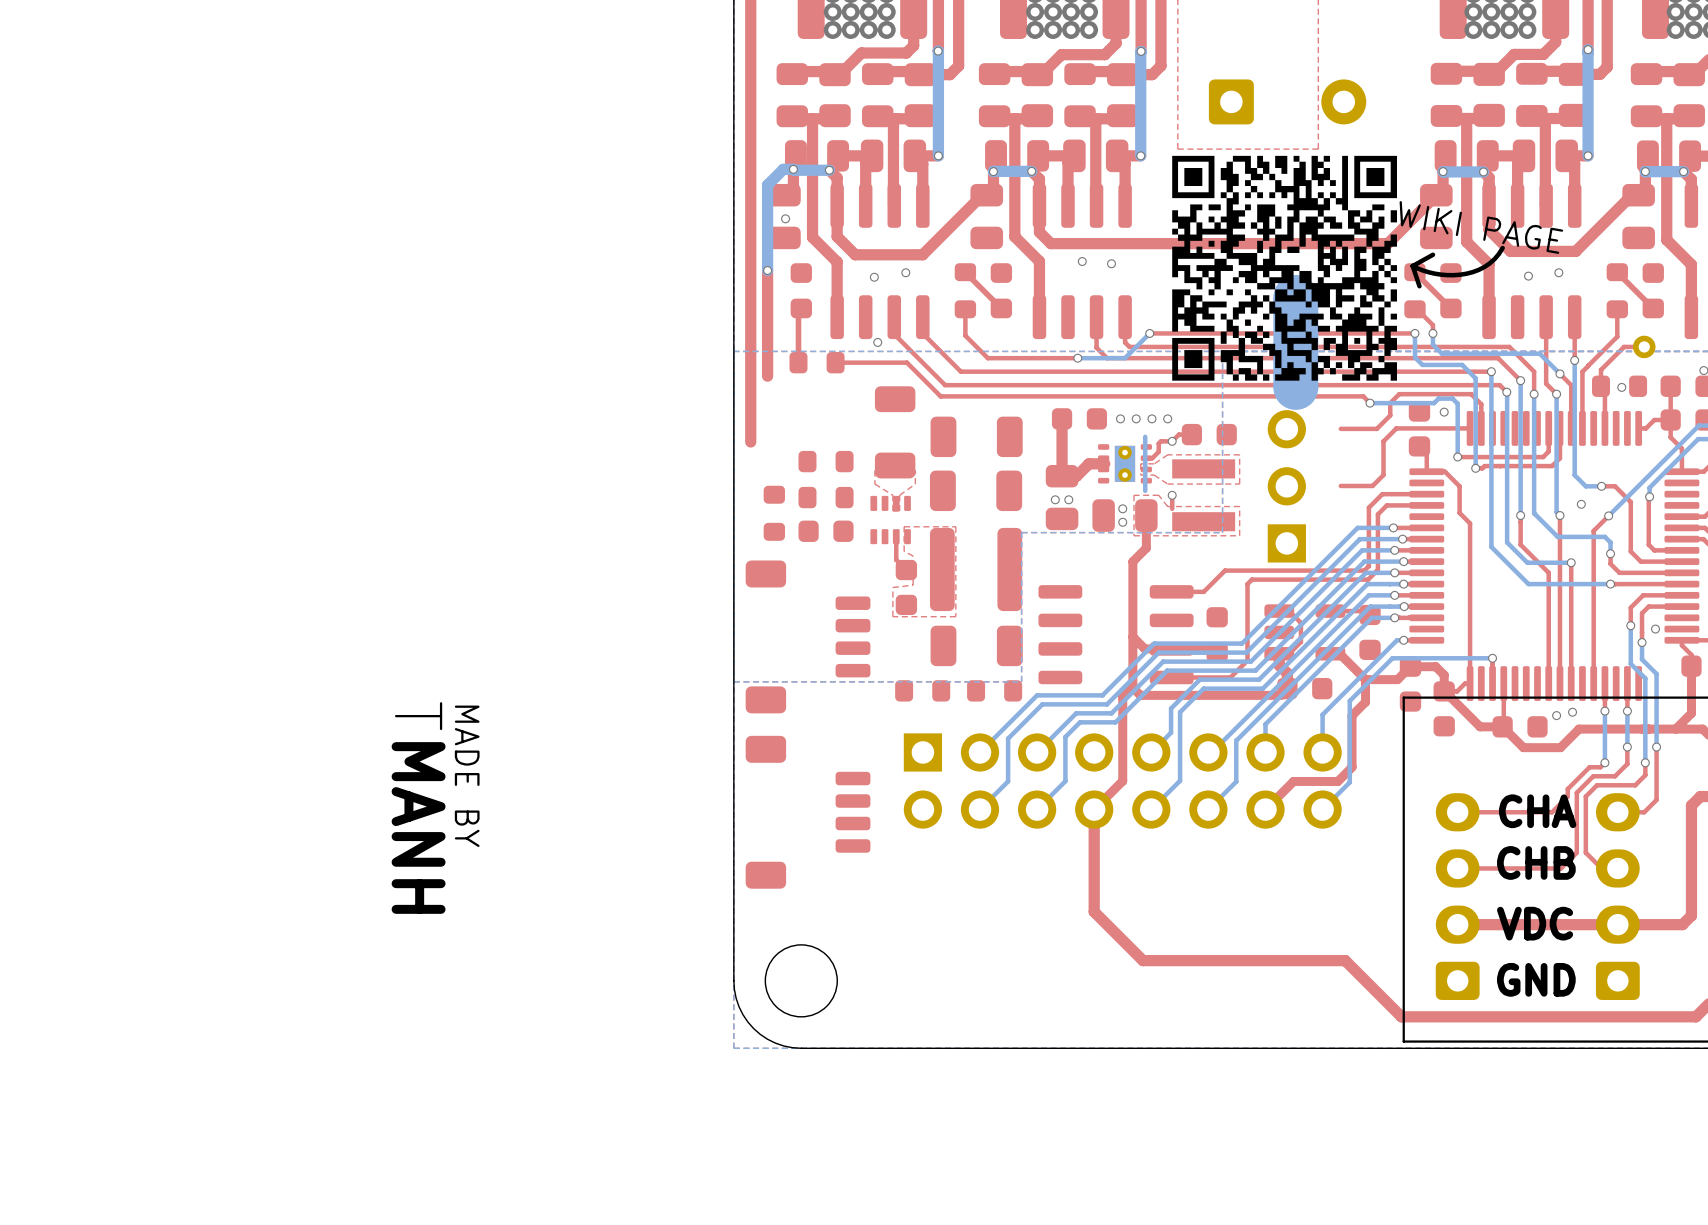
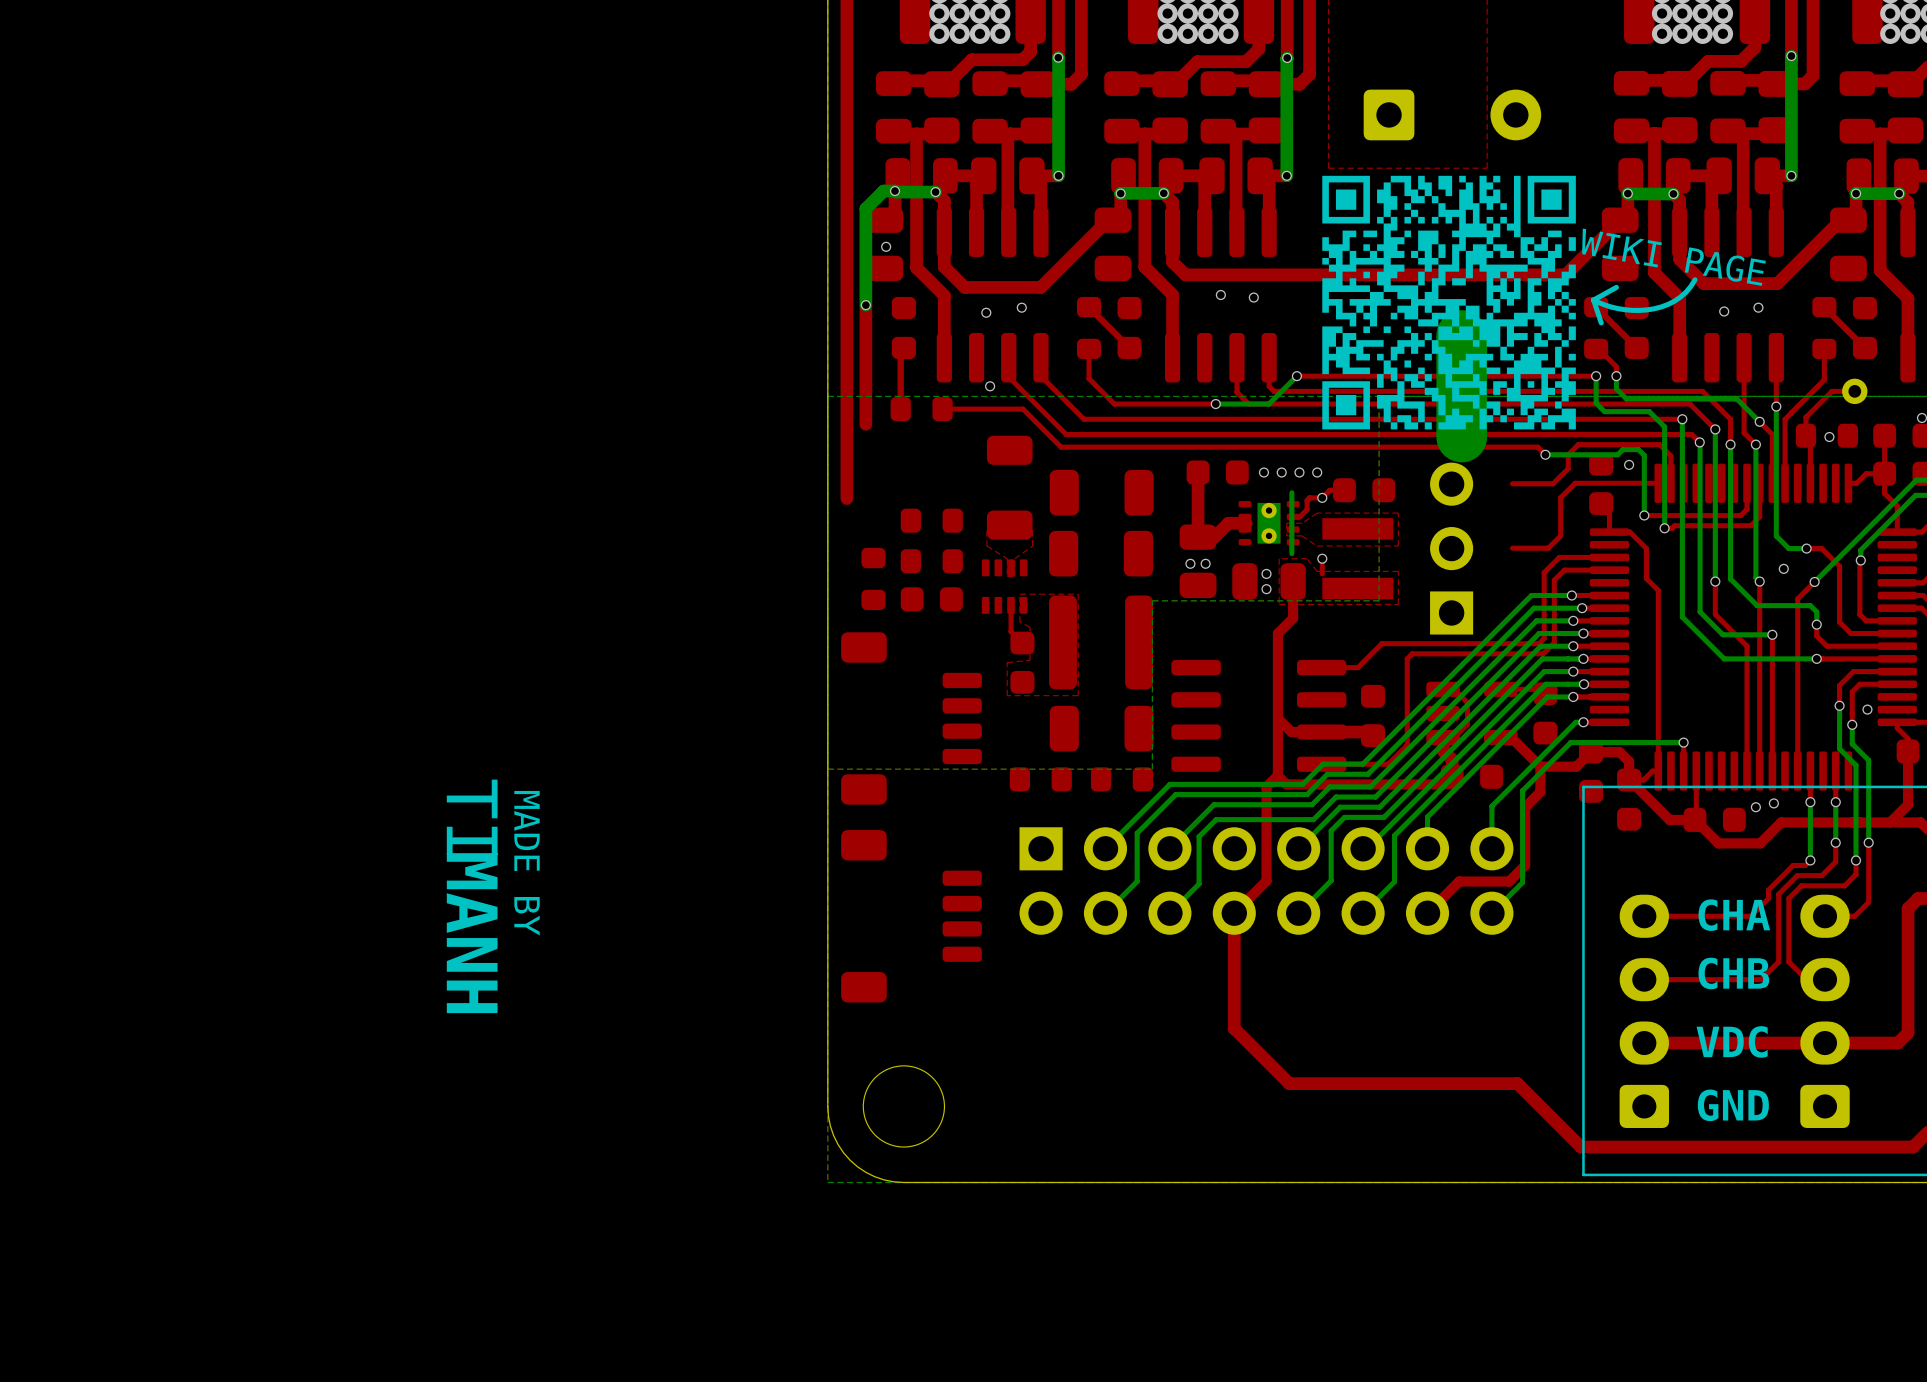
bottom track: (1241, 643) (1154, 643) (1102, 695) -> (1400, 725) (1362, 764) (1323, 764) (1302, 784) (1243, 784)
bottom track: (1246, 652) (1158, 652) (1107, 704) -> (1406, 736) (1367, 774) (1327, 774) (1307, 794) (1248, 794)
bottom track: (1250, 661) (1163, 661) (1111, 713) -> (1411, 746) (1370, 786) (1329, 786) (1312, 804) (1253, 804)
bottom track: (1255, 670) (1167, 670) (1115, 722) (1080, 722) (1065, 736) (1065, 781) (1062, 783) -> (1416, 756) (1375, 797) (1336, 797) (1313, 819) (1216, 819) (1199, 836) (1199, 884)
bottom track: (1259, 679) (1199, 679) (1171, 708) (1171, 732) -> (1420, 766) (1379, 807) (1340, 807) (1320, 826)
bottom track: (1262, 688) (1203, 688) (1180, 712) (1180, 736) -> (1424, 776) (1384, 817) (1344, 817) (1331, 830)

